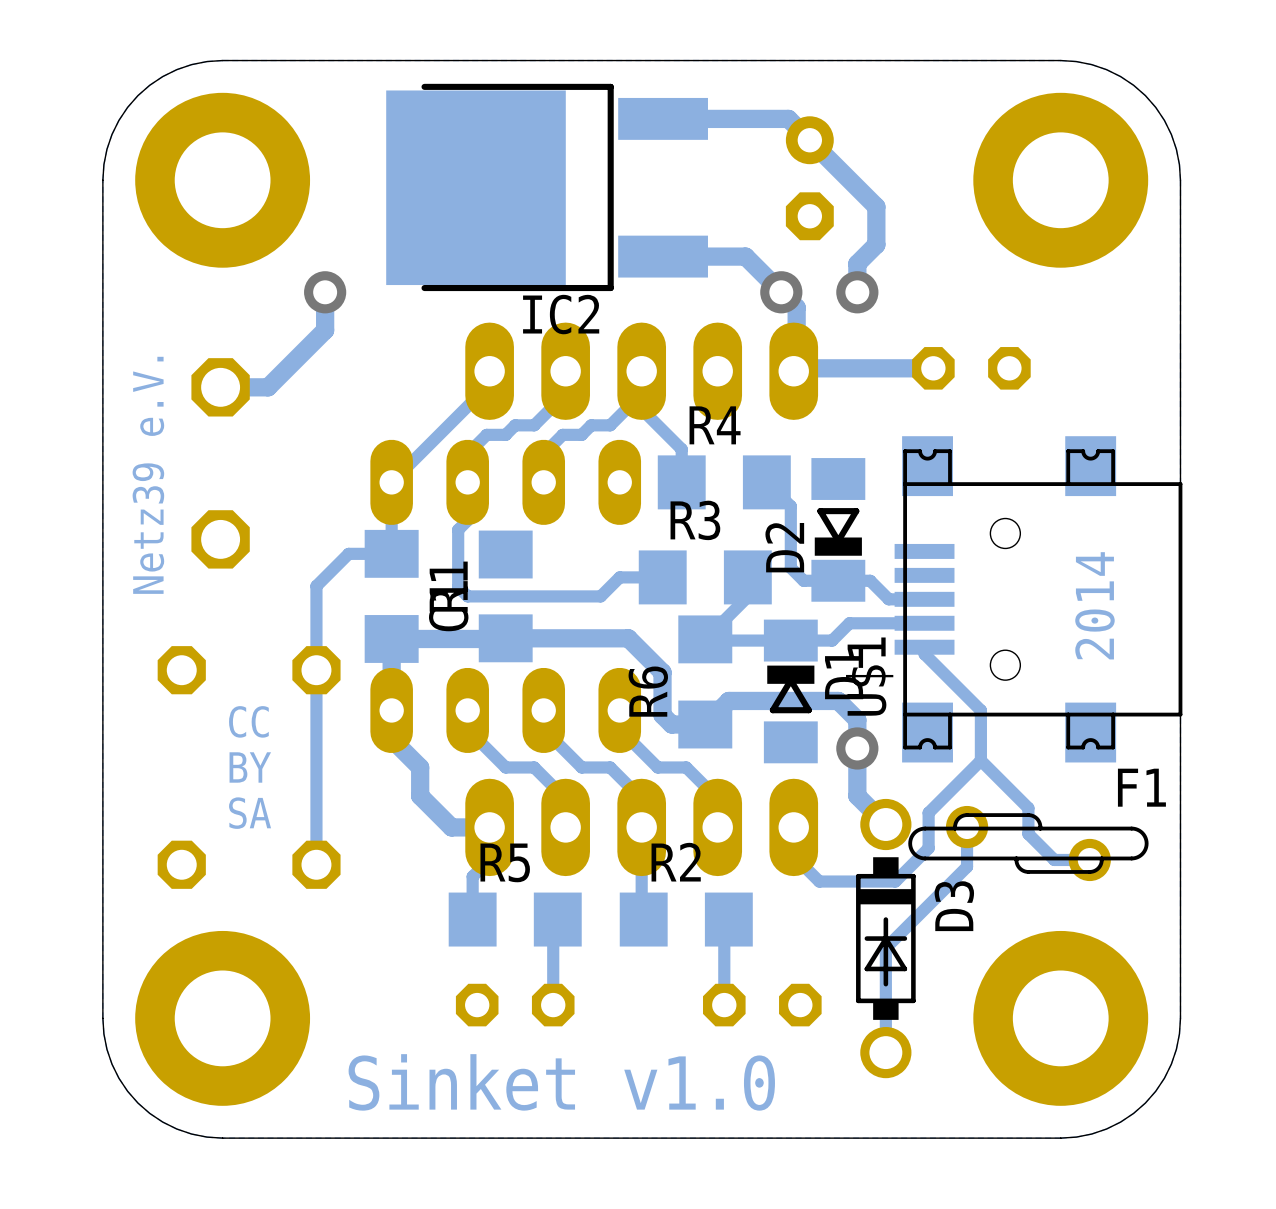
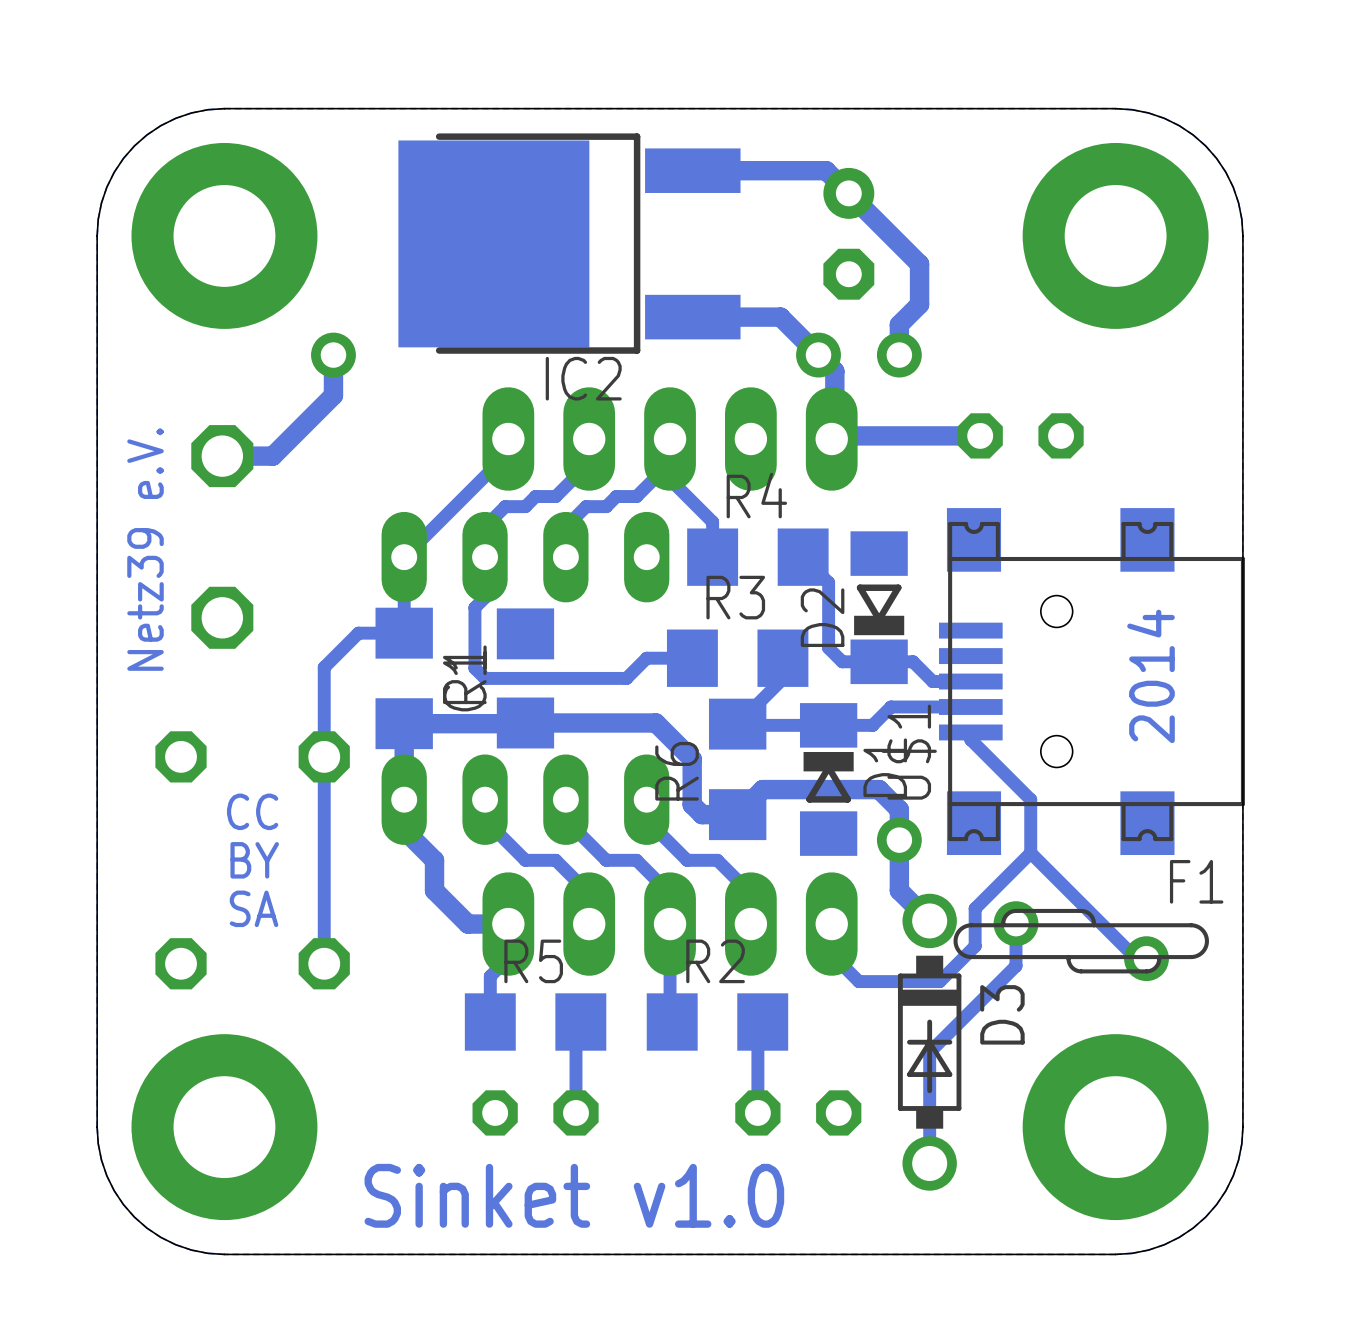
track: (1028, 808) (1028, 834) (1054, 859) (1089, 859) -> (1081, 903) (1146, 968)

